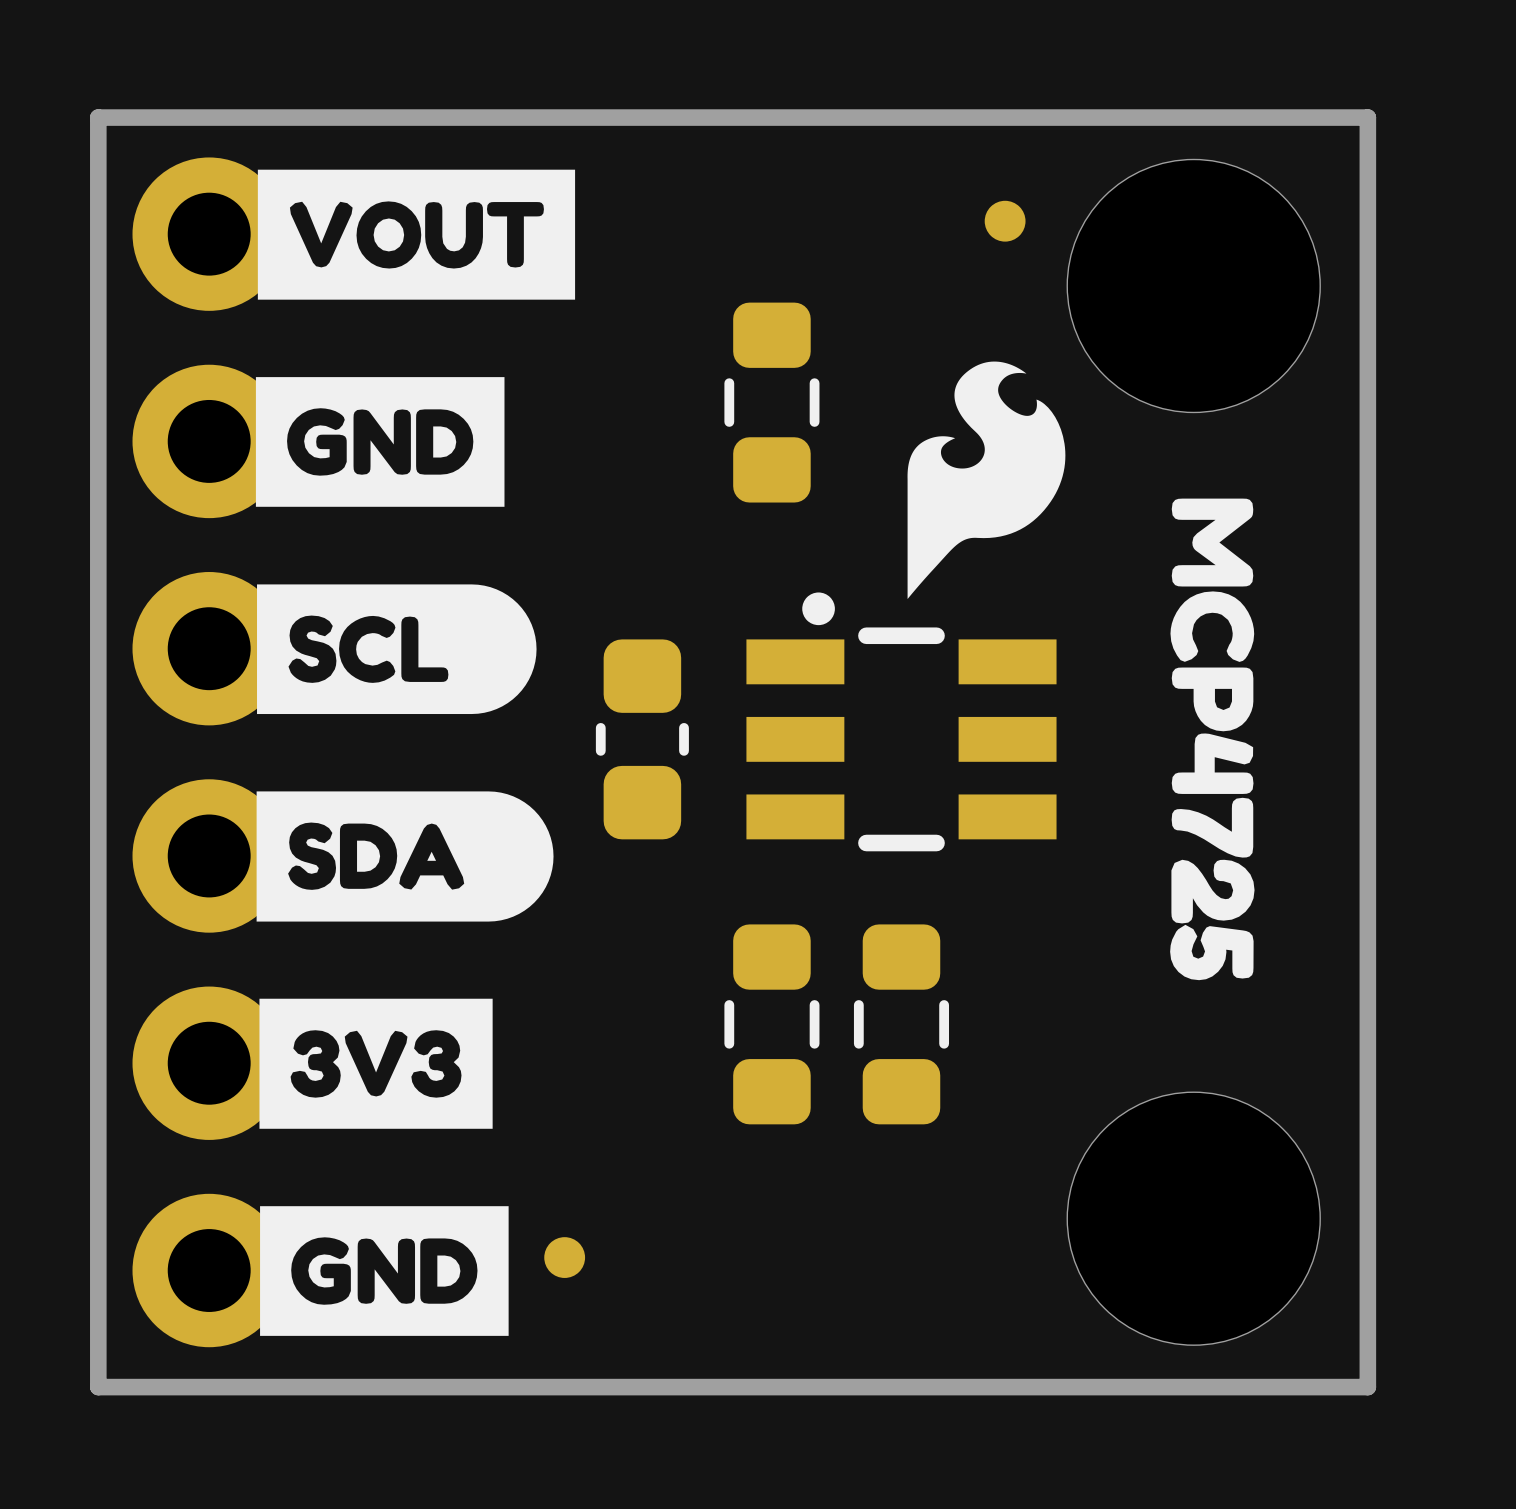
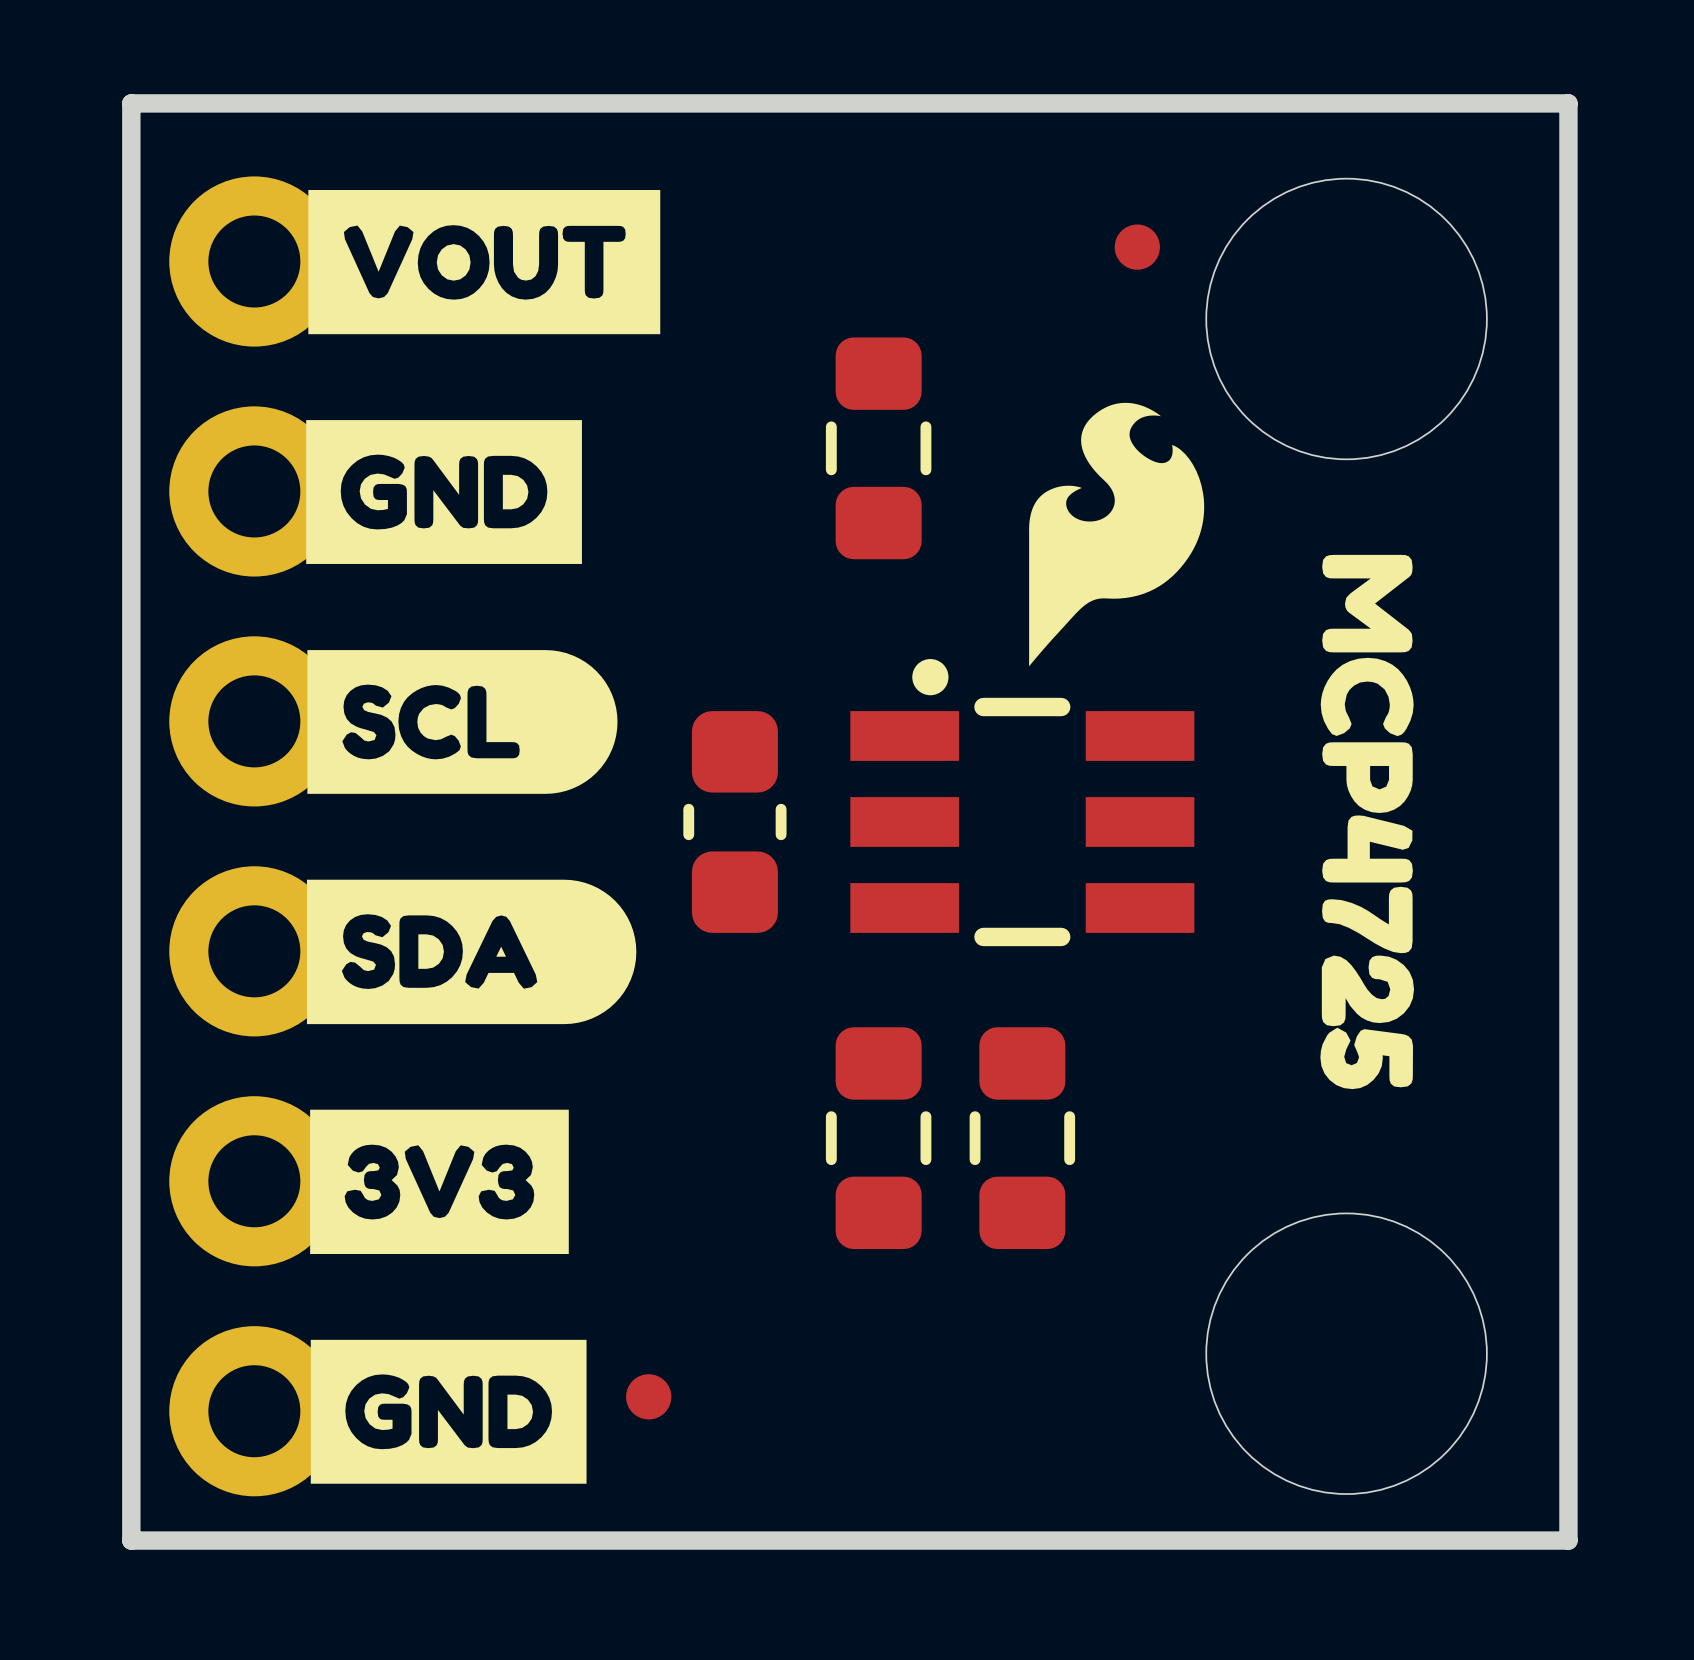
board edge: (98, 117) (1367, 117) (1367, 1387) -> (131, 132) (131, 103) (1568, 103) (1568, 1540) (1539, 1540)

